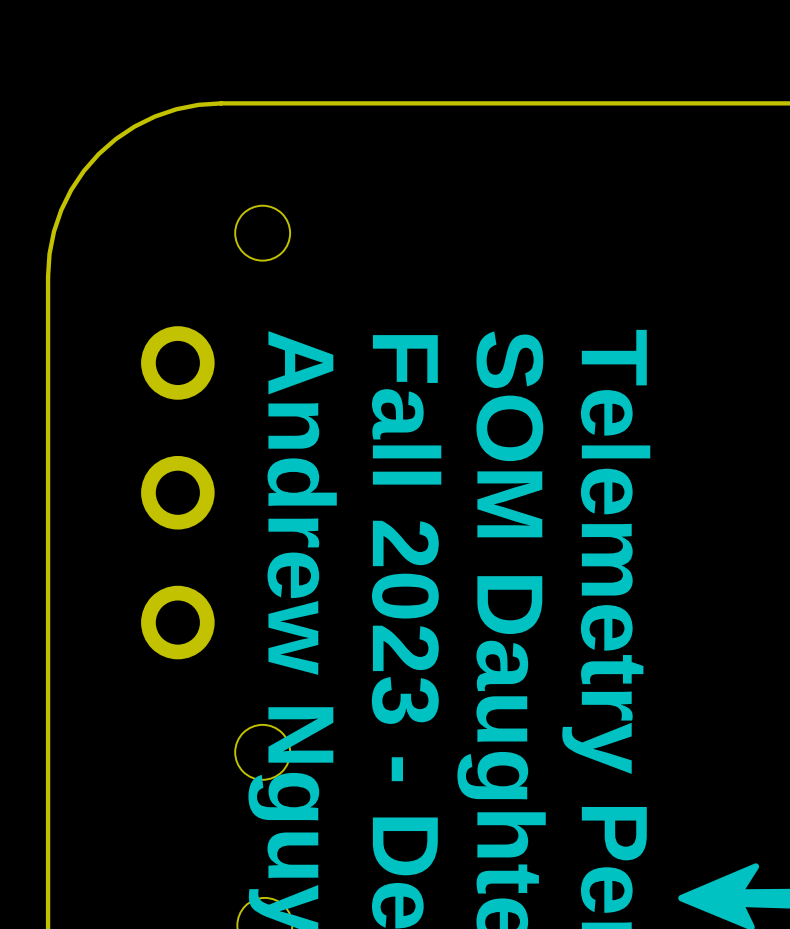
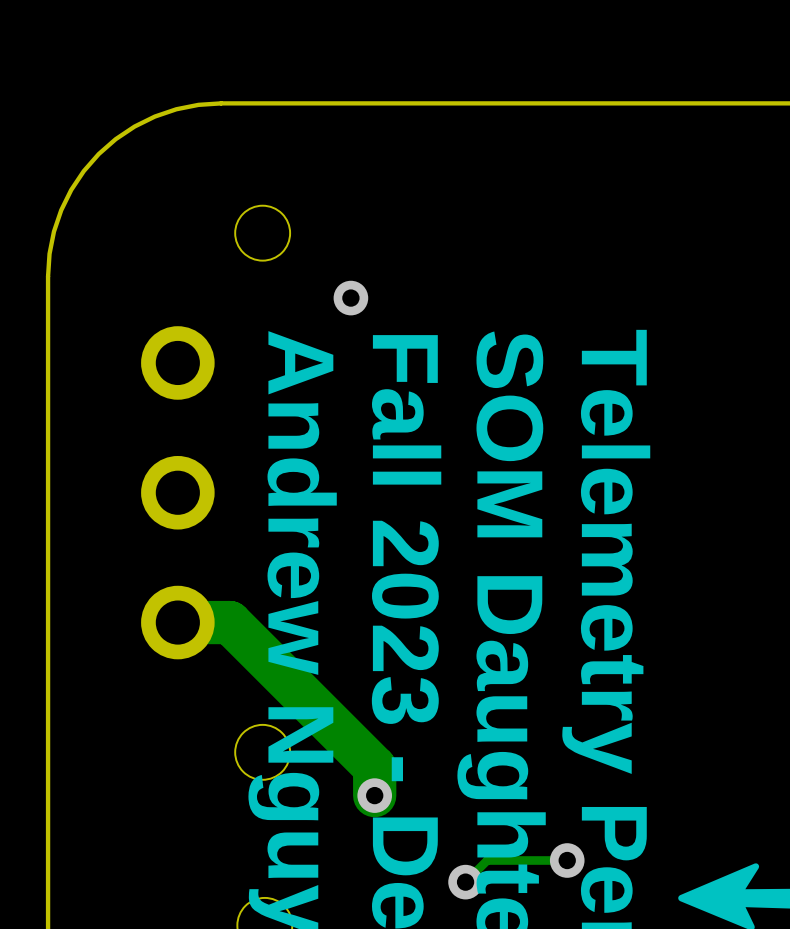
via: none -> (350, 298)
track: none -> (177, 622) (229, 622) (374, 767) (374, 795)
via: none -> (374, 795)
track: none -> (567, 860) (487, 860) (465, 882)
via: none -> (567, 860)
via: none -> (465, 882)

